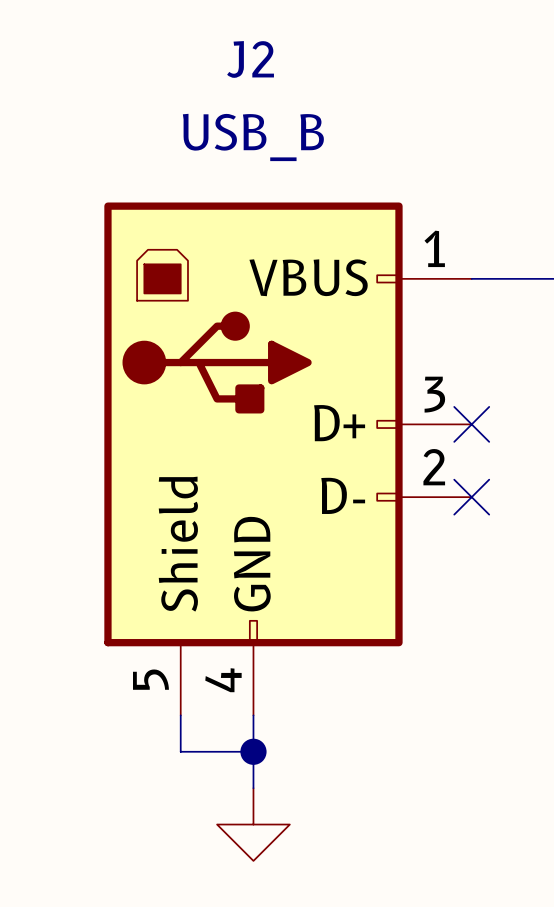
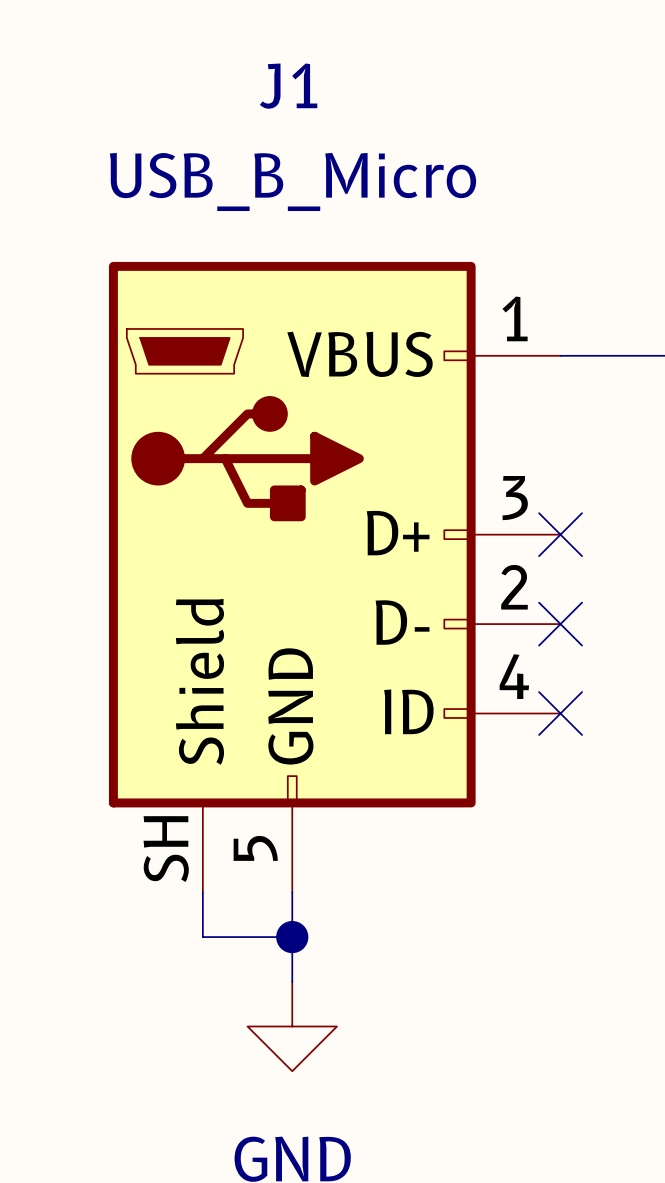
J2: USB_B (288, 458) -> none
J1: none -> USB_B_Micro (334, 577)
no-connect mark: none -> (560, 713)

